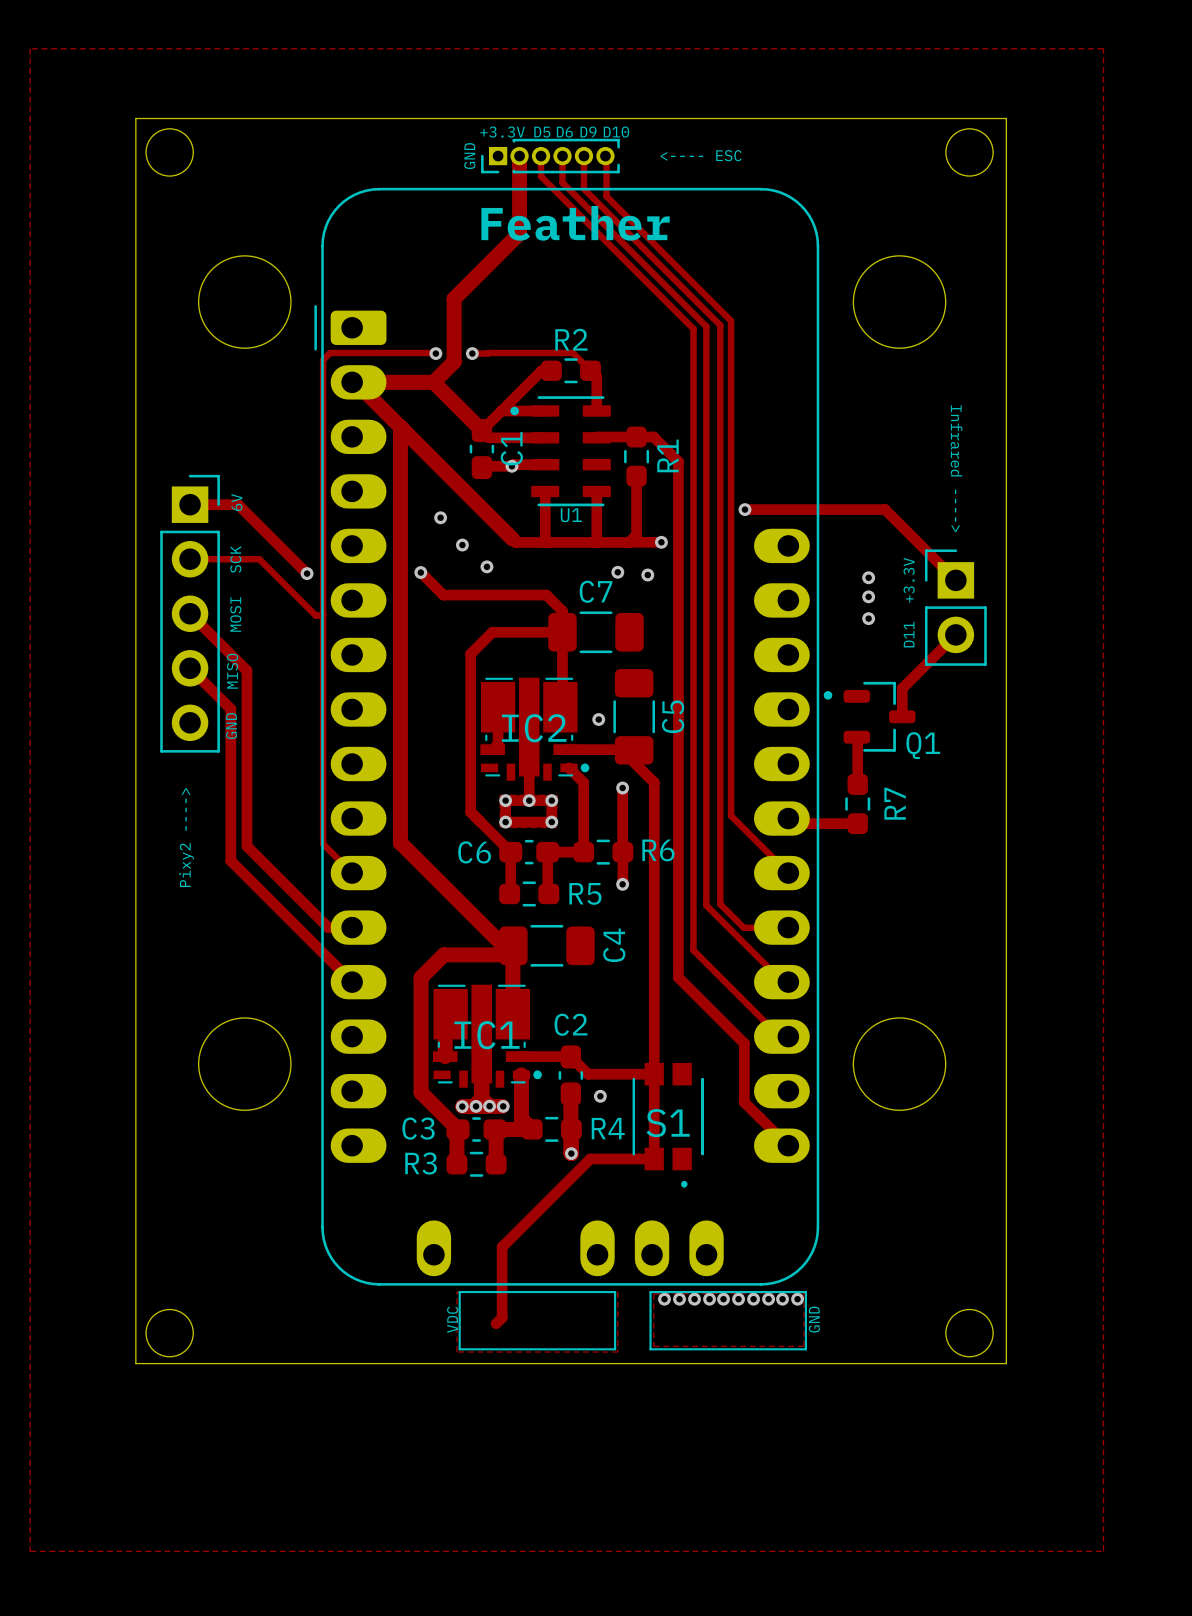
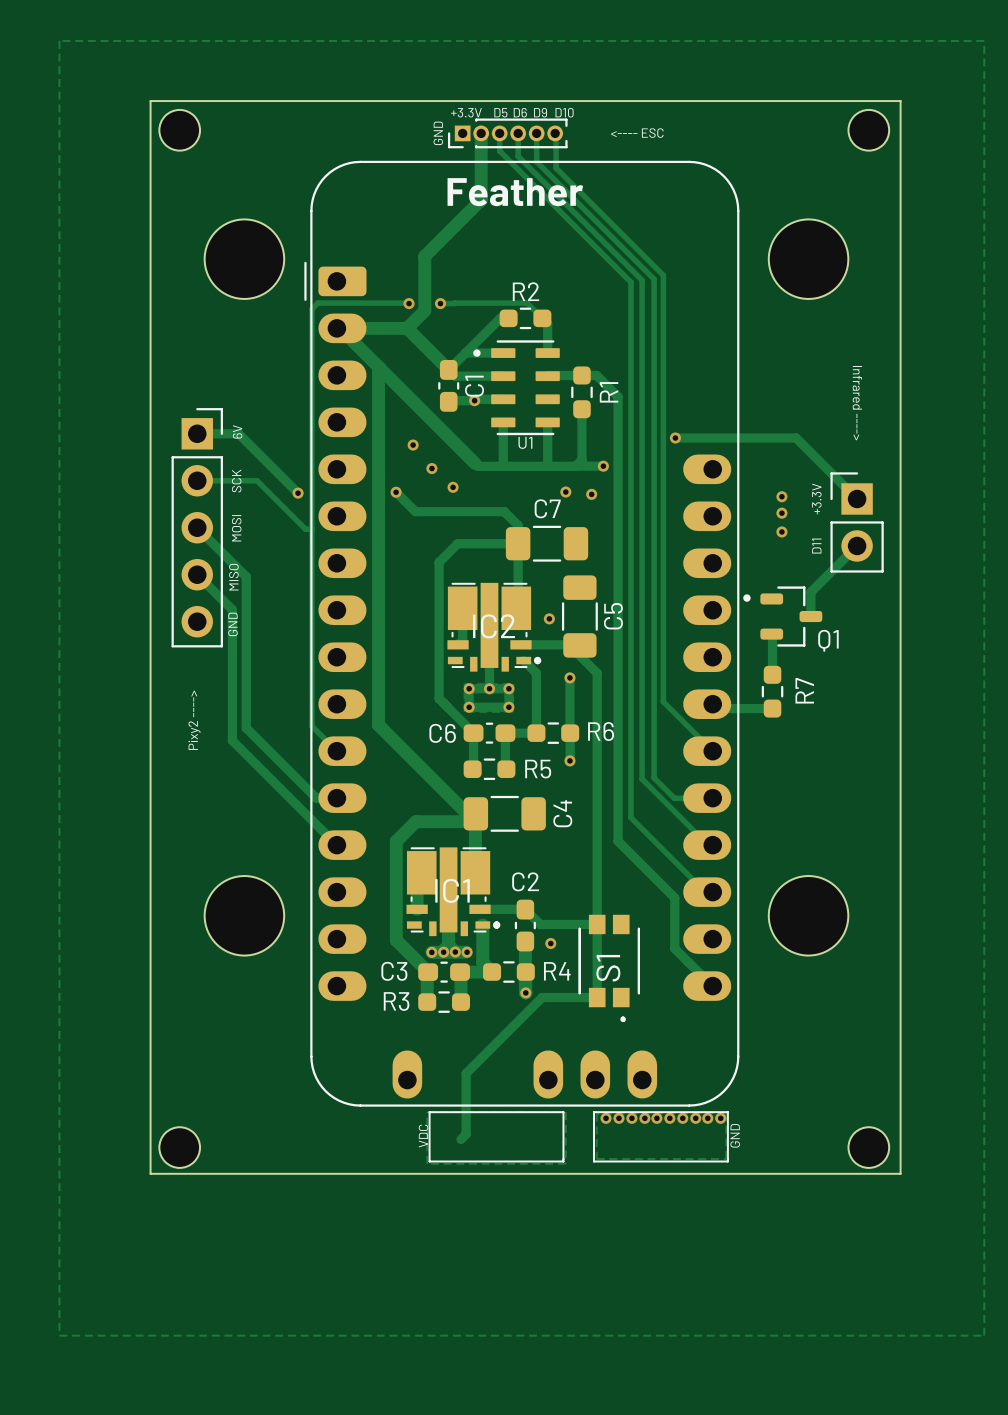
S1 name rotation: 0° (668, 1123) -> 90° counterclockwise (608, 968)

